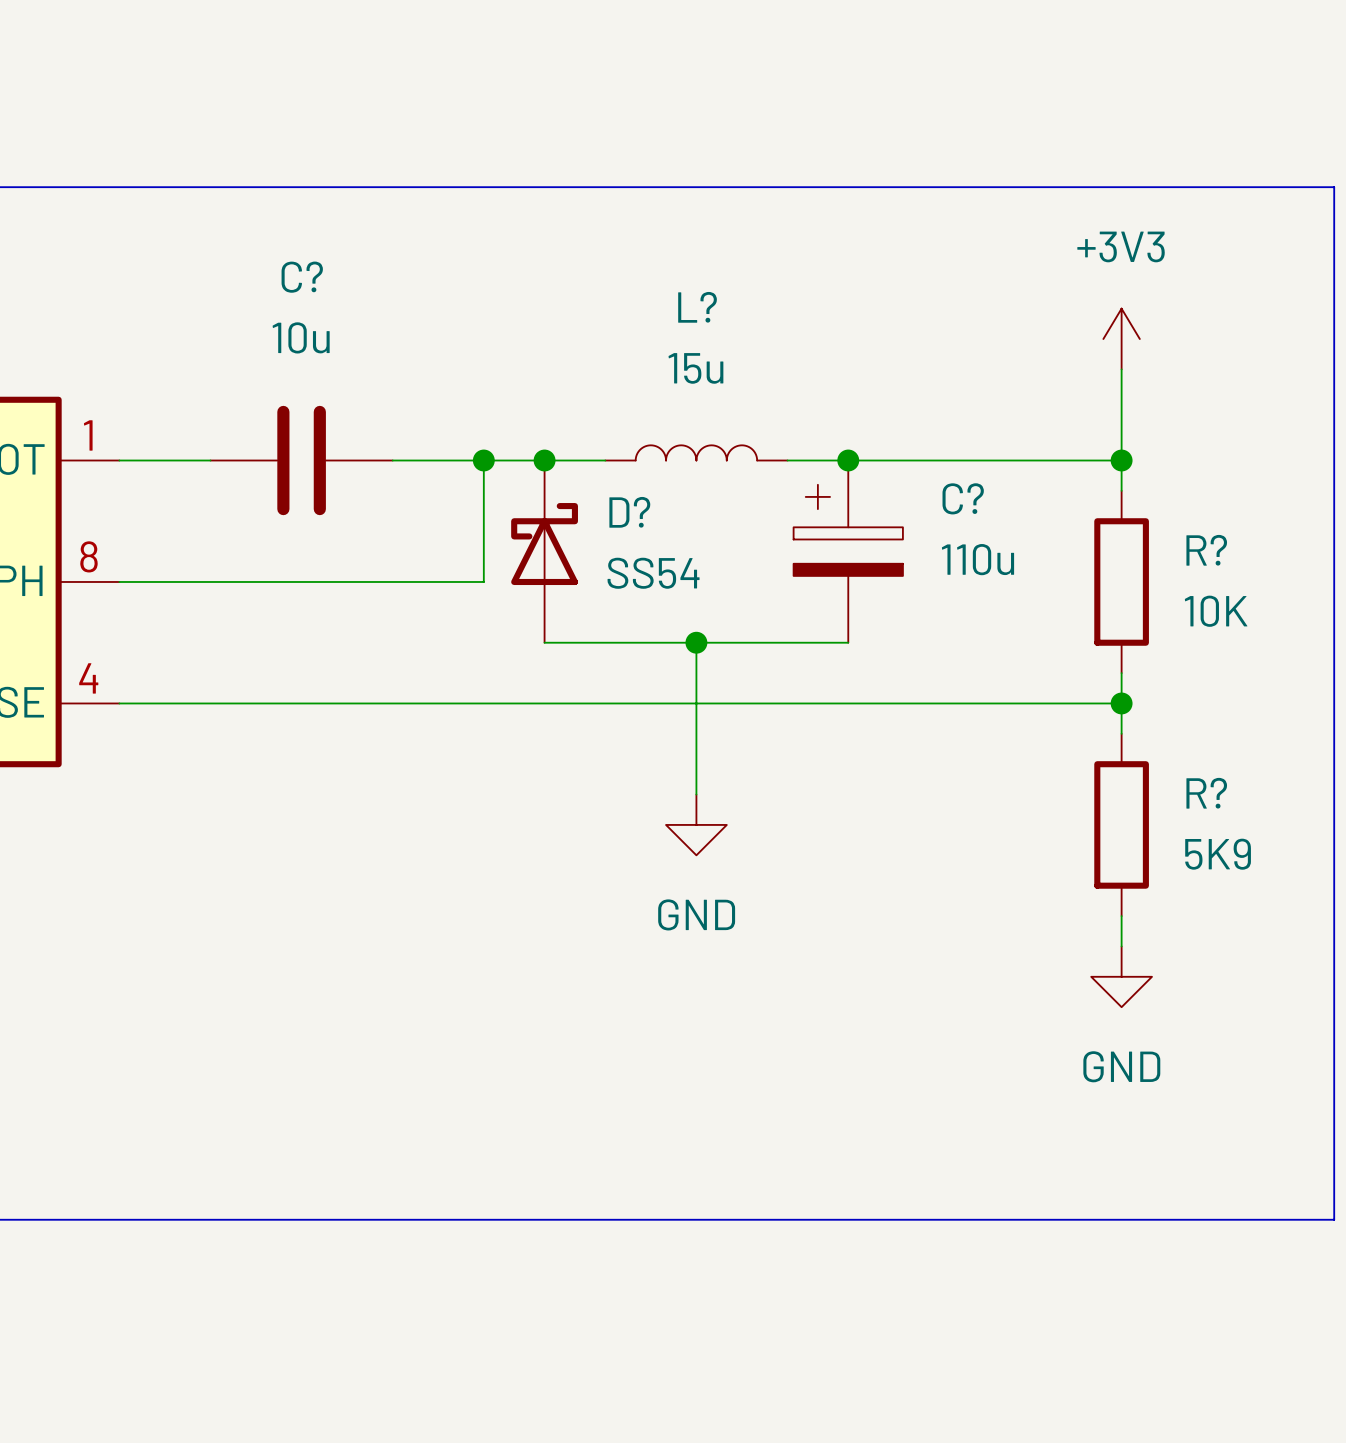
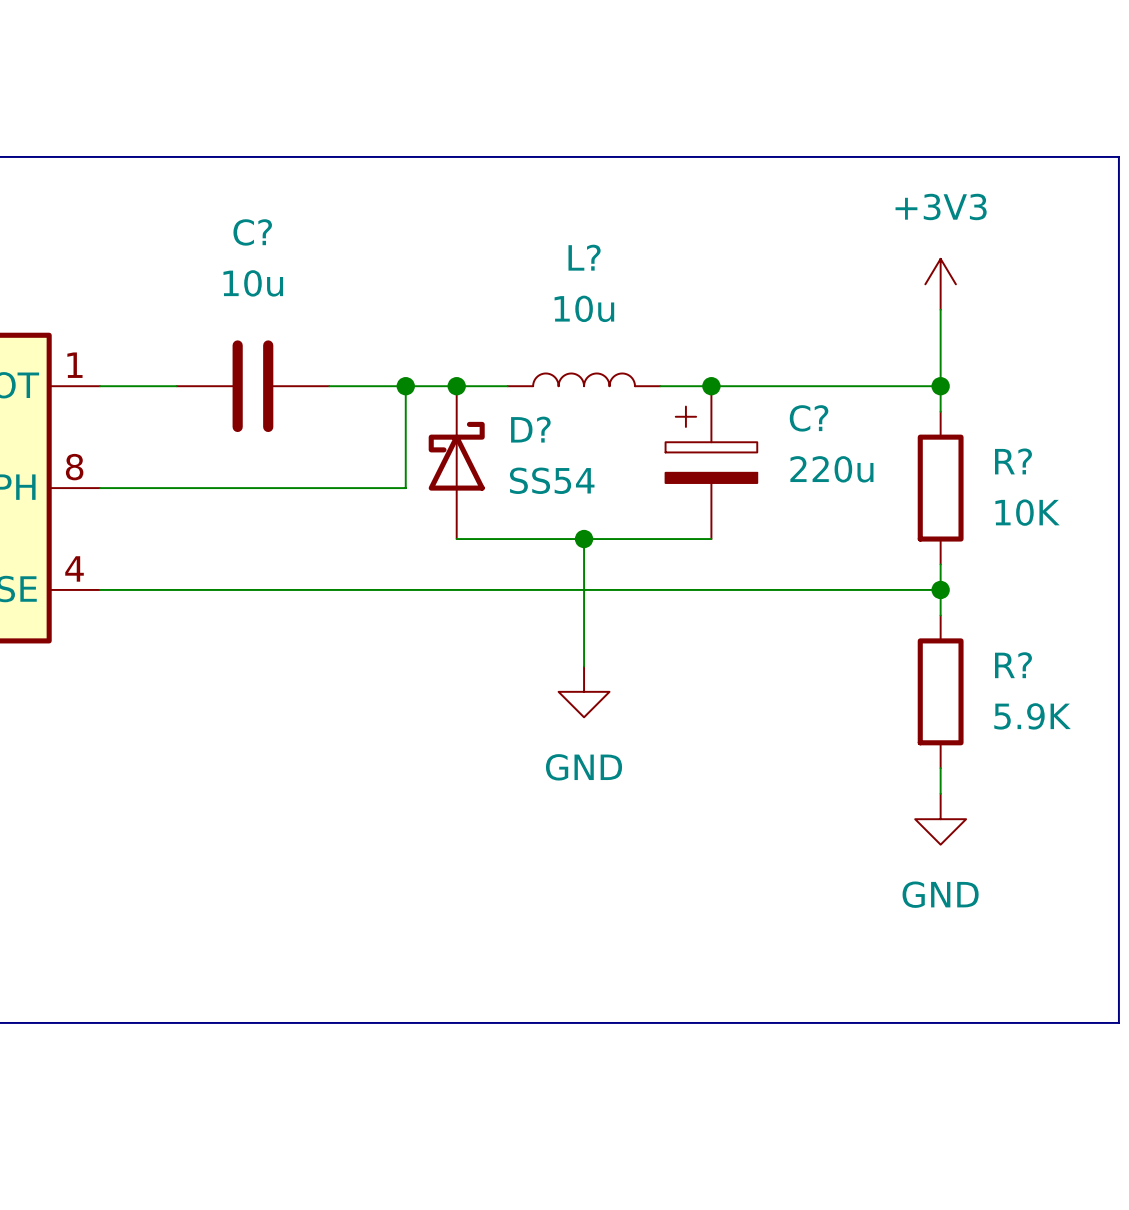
L? value: 15u (695, 368) -> 10u (584, 308)
C? value: 110u (977, 559) -> 220u (831, 469)
R? value: 5K9 (1218, 854) -> 5.9K (1032, 716)

